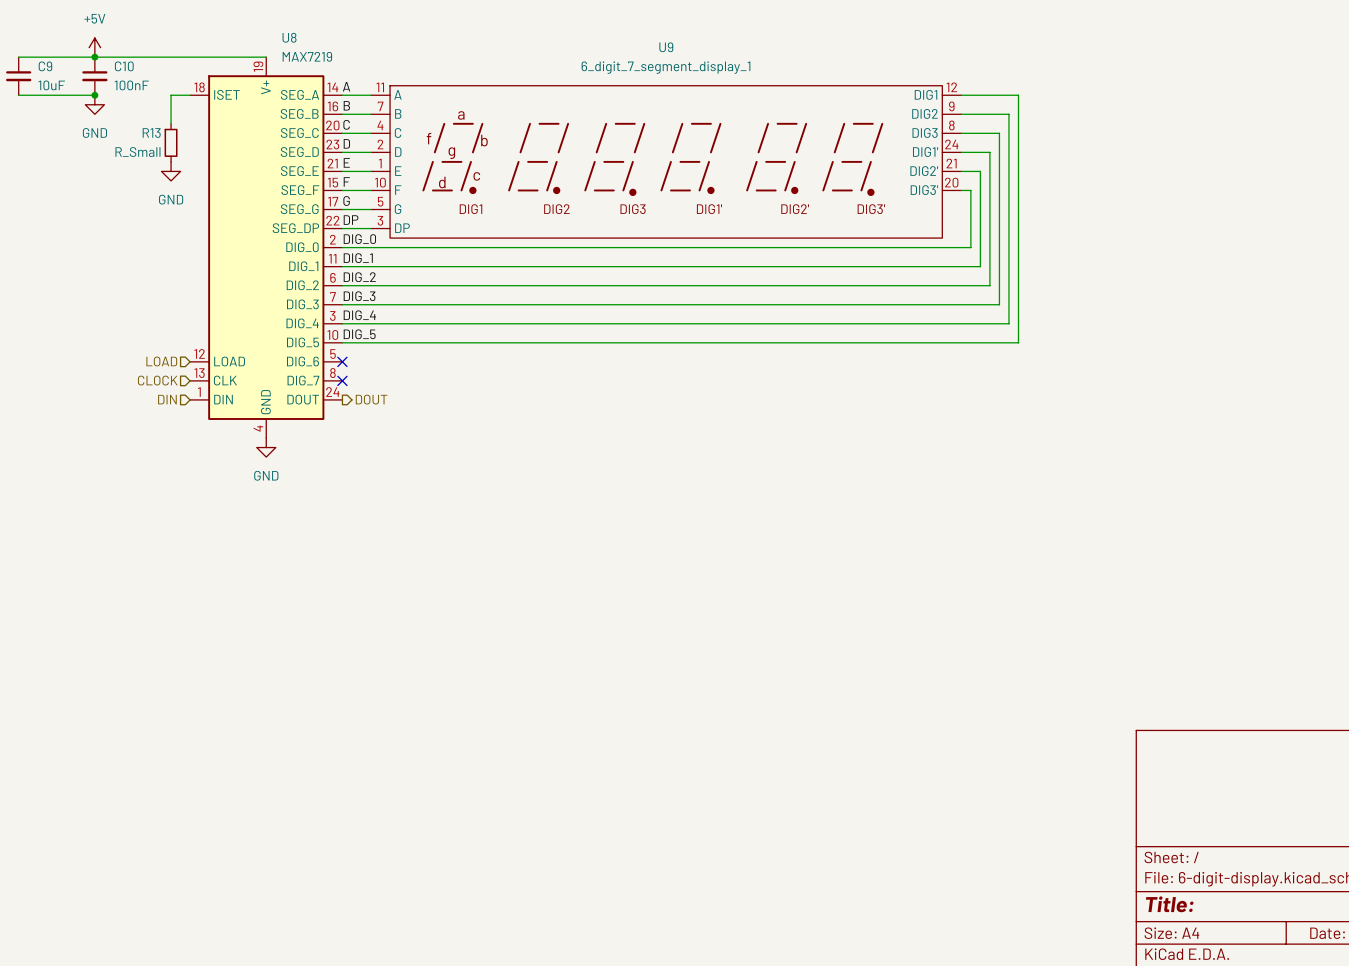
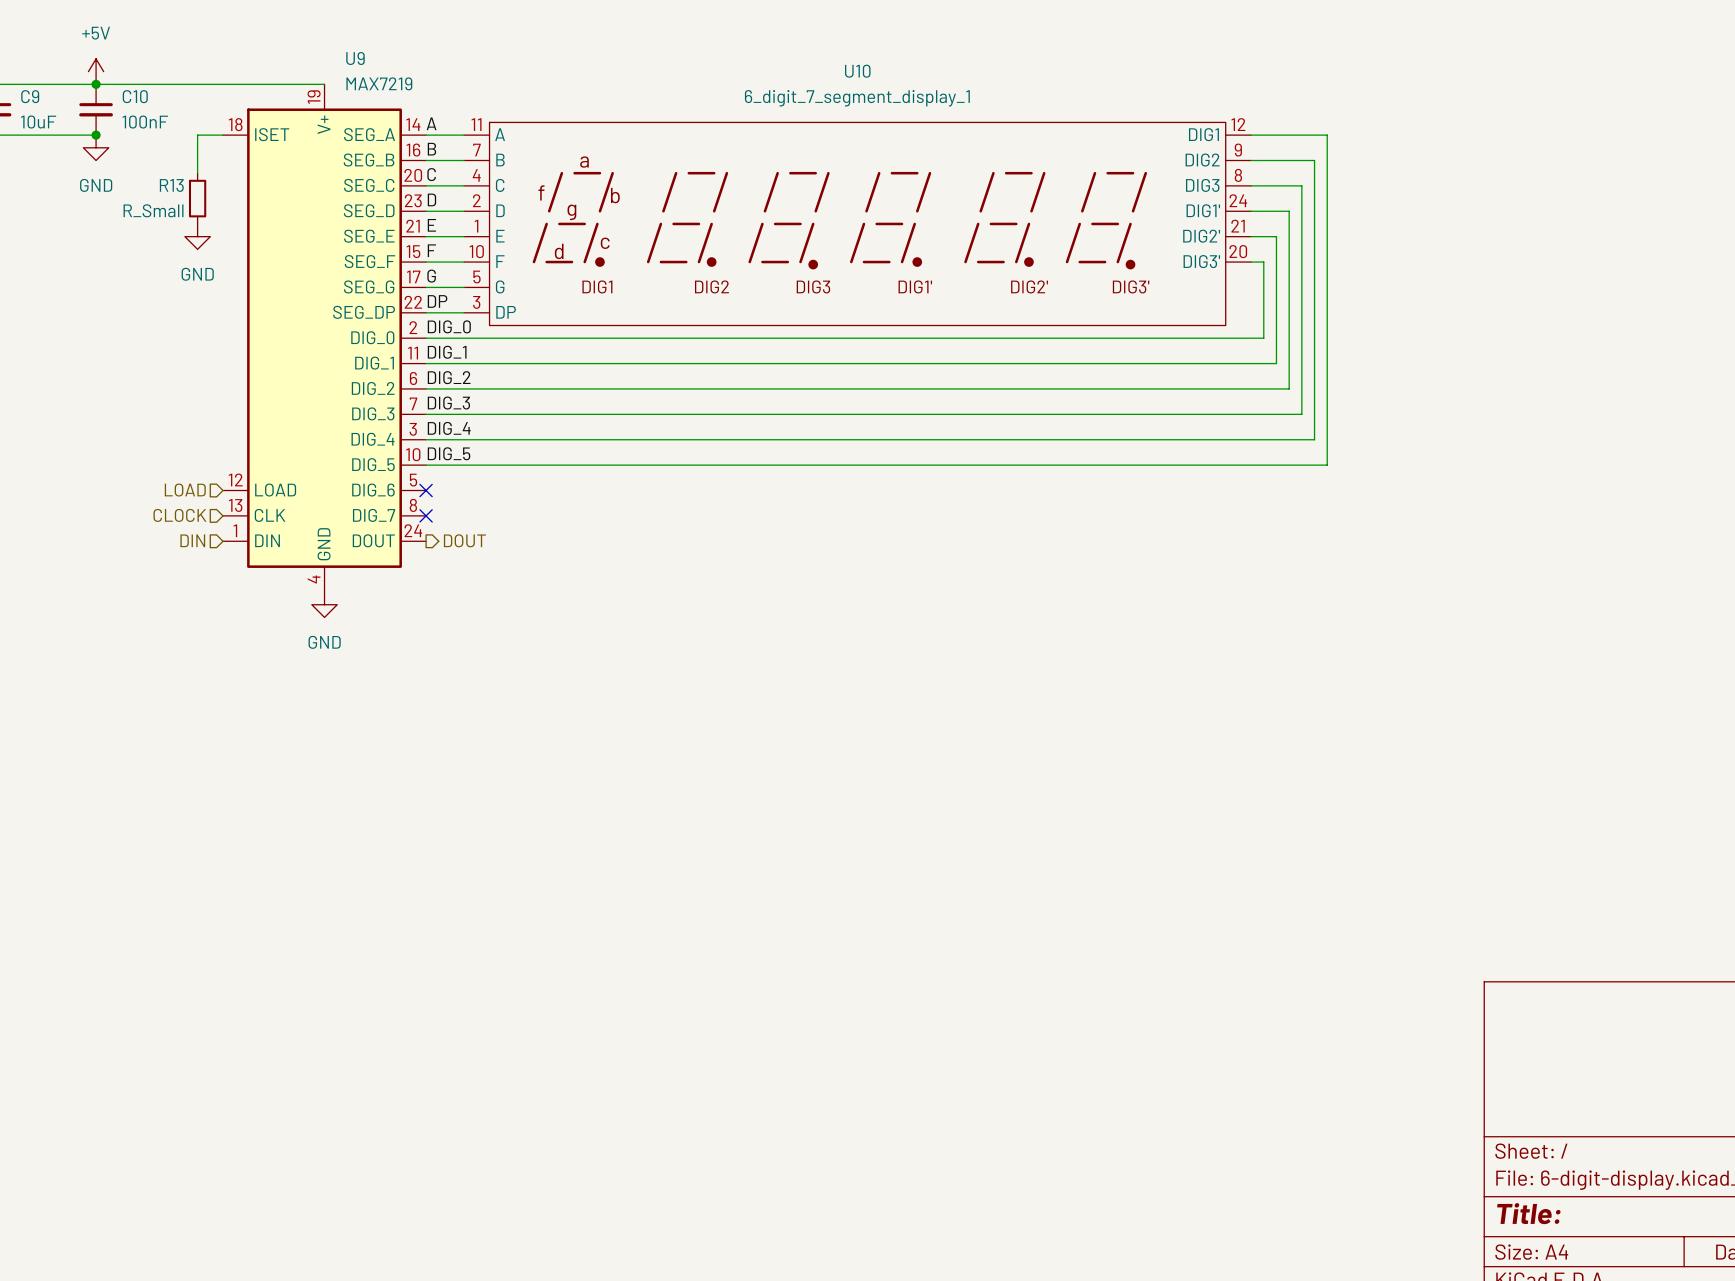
U8 name: U8 (289, 37) -> U9 (355, 58)
U9 name: U9 (666, 47) -> U10 (857, 71)

